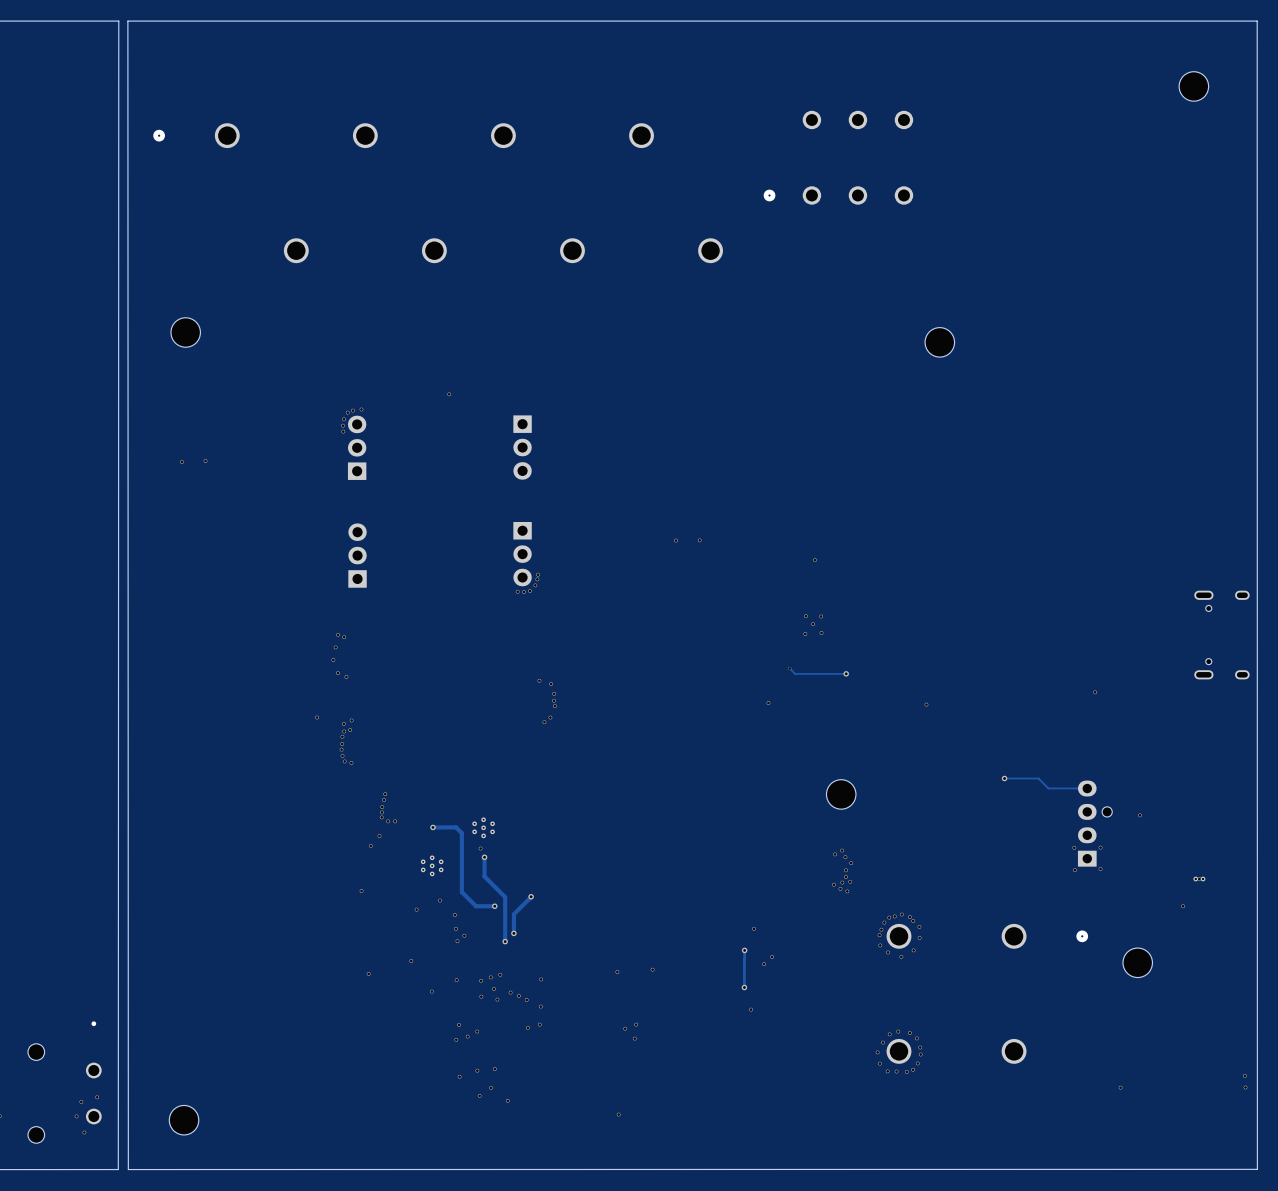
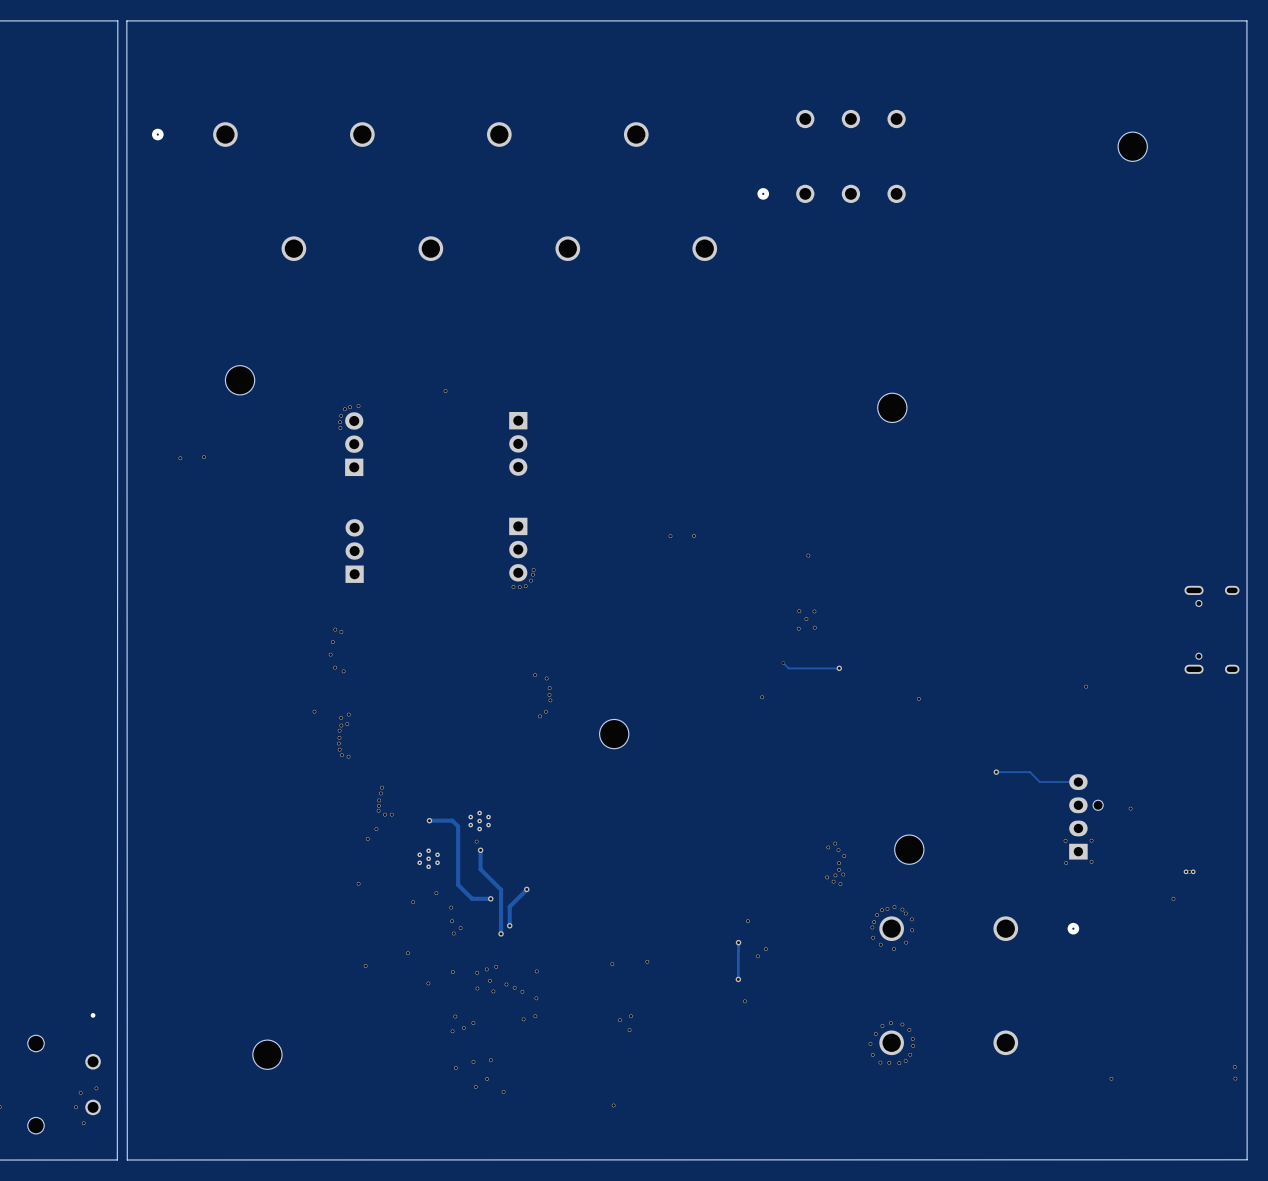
part position: (1193, 86) -> (1132, 146)
part position: (185, 332) -> (240, 380)
part position: (939, 342) -> (892, 407)
part: none -> (614, 734)
part position: (841, 794) -> (909, 849)
part: (1137, 962) -> none
part position: (184, 1120) -> (267, 1054)

